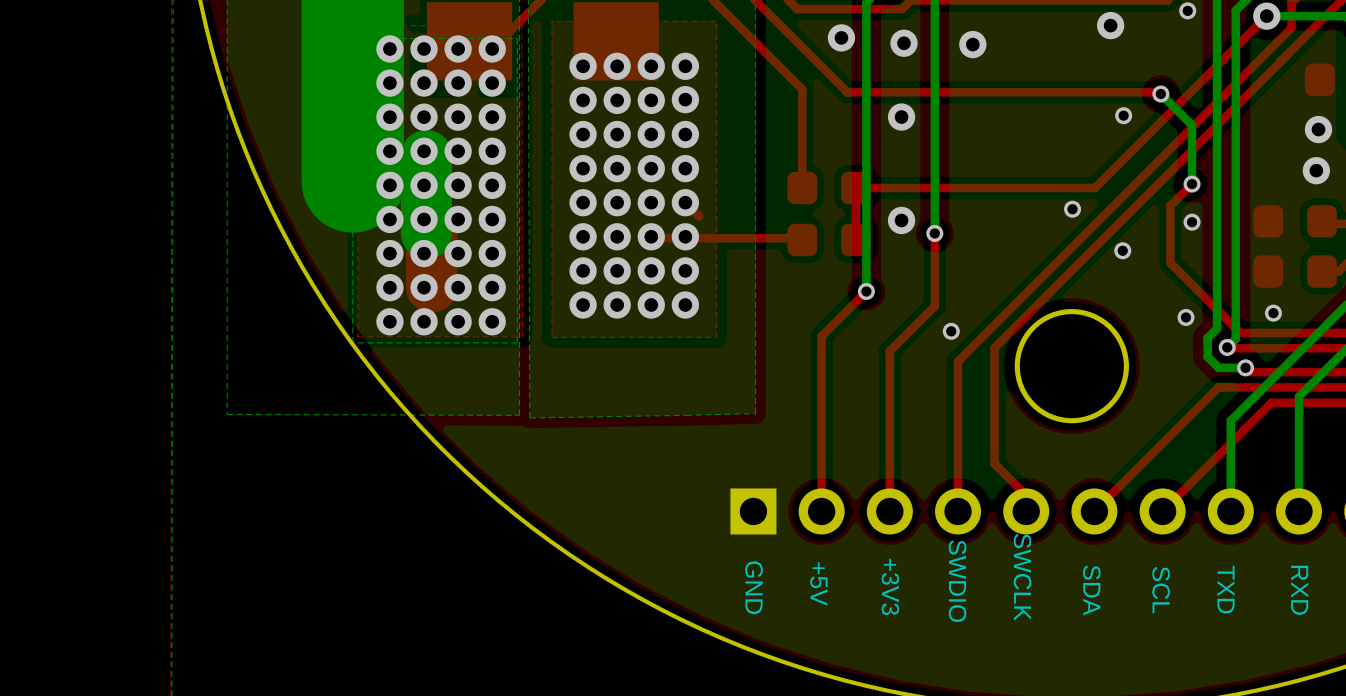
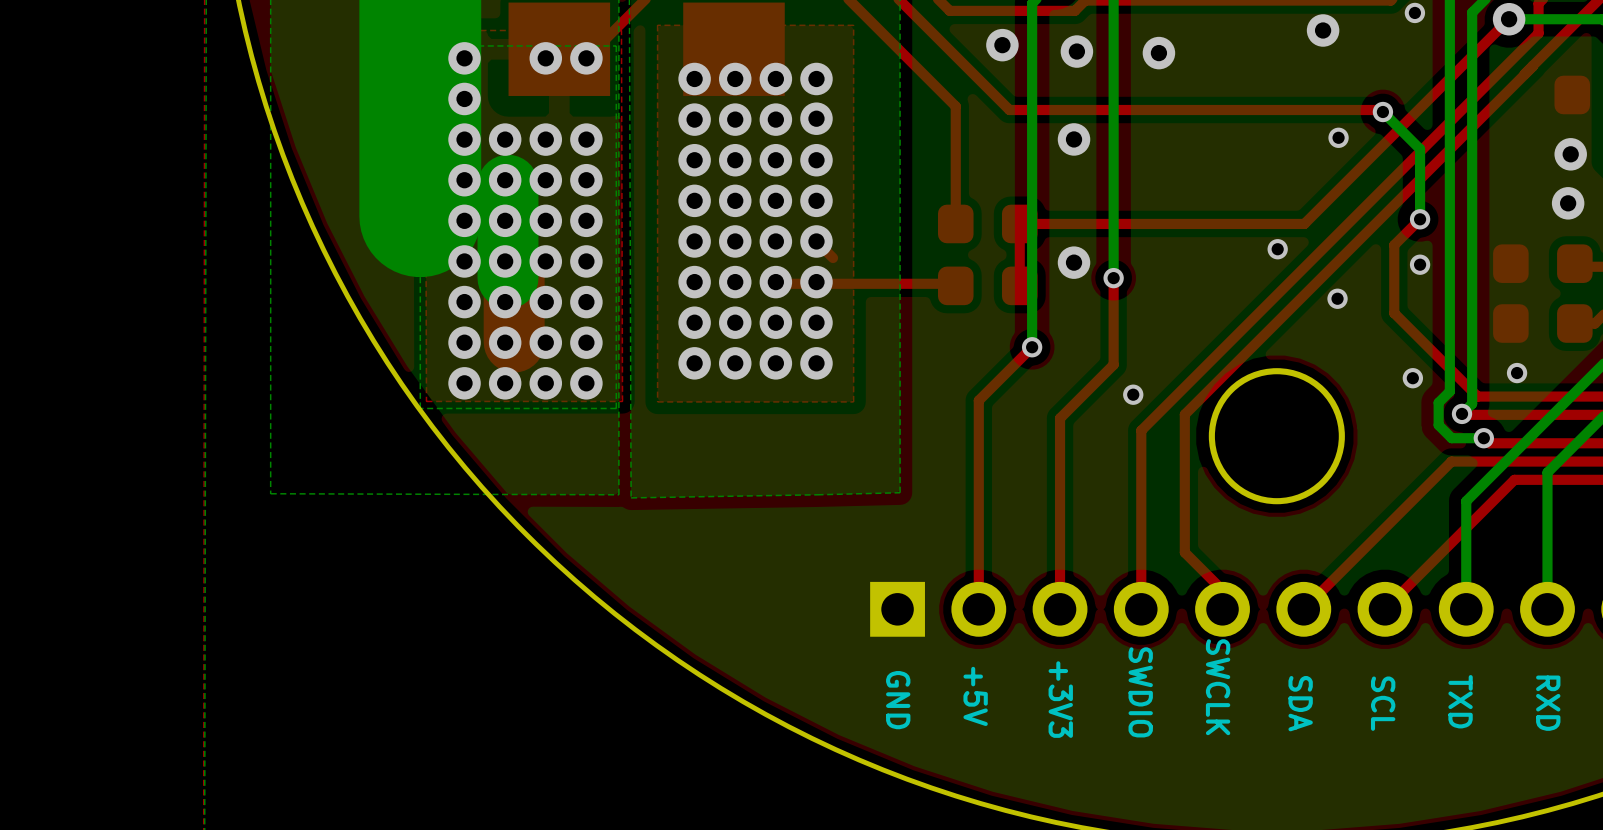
via: (424, 48) -> none
via: (424, 83) -> none
via: (458, 83) -> none
via: (492, 83) -> none

